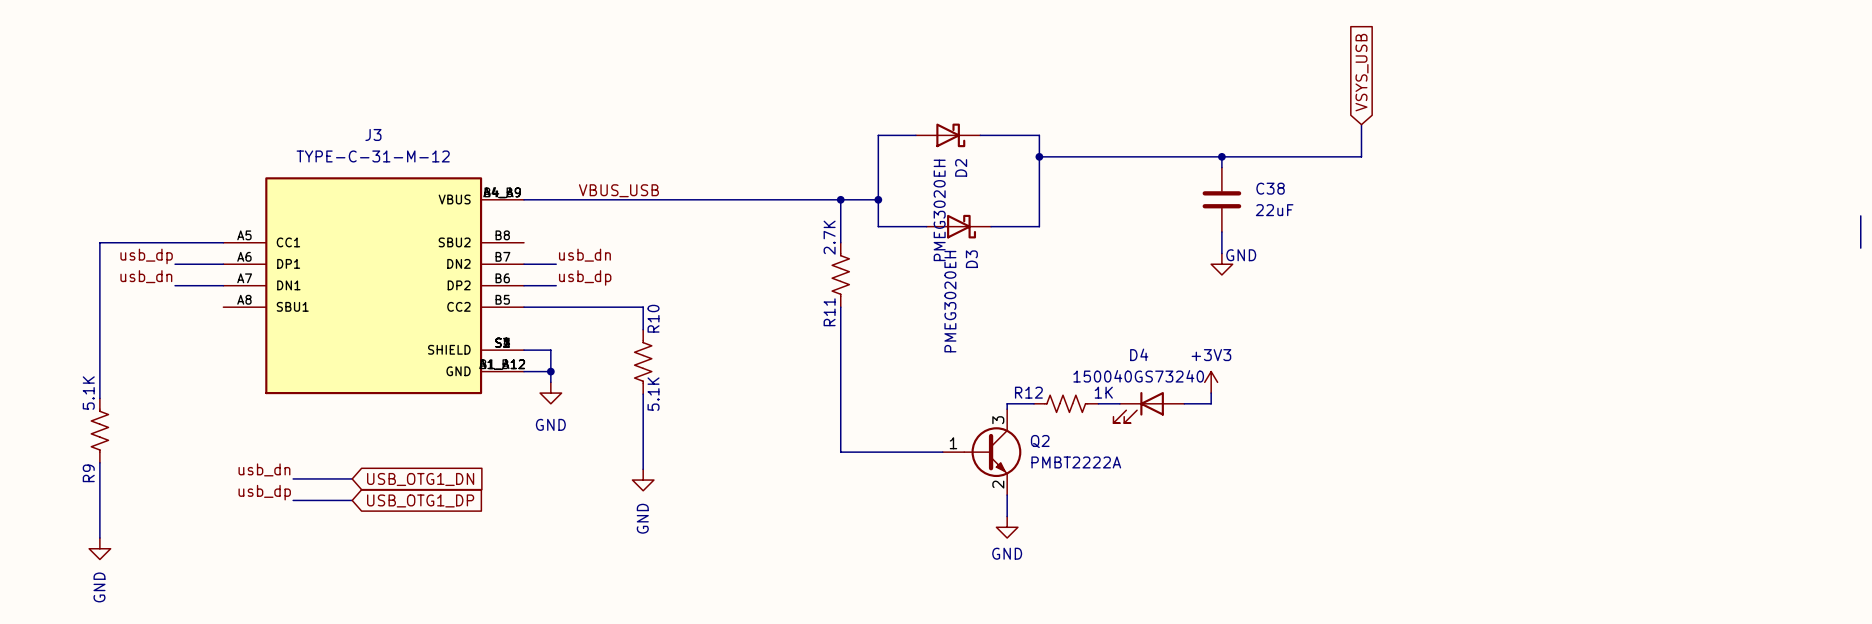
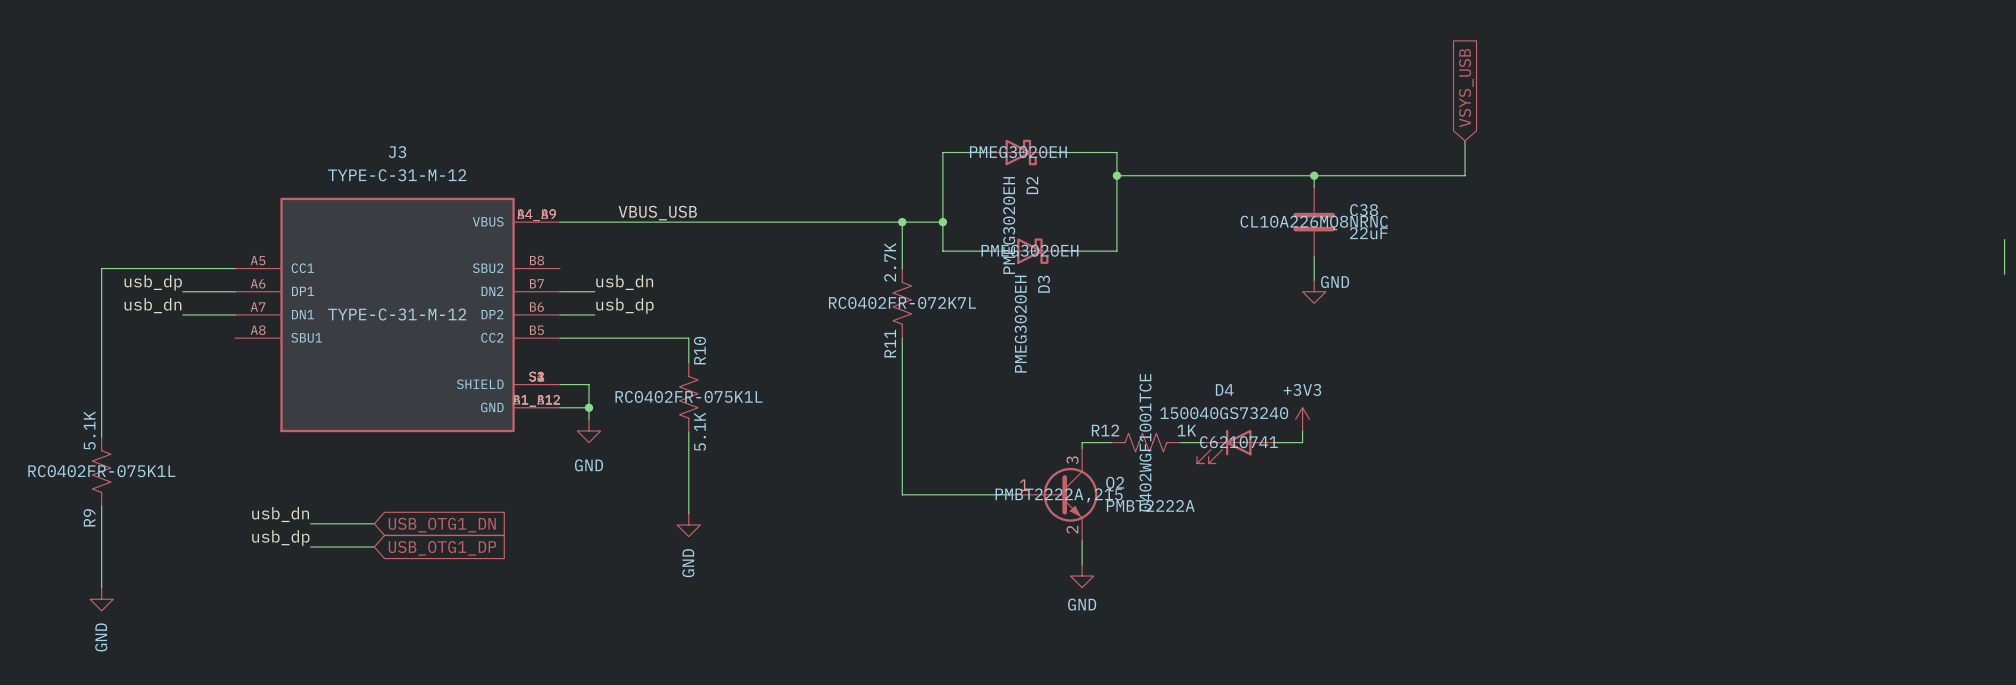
D2 text: none -> PMEG3020EH (1018, 152)
C38 text: none -> CL10A226MQ8NRNC (1314, 222)
D3 text: none -> PMEG3020EH (1029, 250)
R11 text: none -> RC0402FR-072K7L (902, 302)
J3 text: none -> TYPE-C-31-M-12 (397, 314)
R10 text: none -> RC0402FR-075K1L (688, 396)
R12 text: none -> 0402WGF1001TCE (1145, 442)
D4 text: none -> C6210741 (1238, 442)
R9 text: none -> RC0402FR-075K1L (101, 471)
Q2 text: none -> PMBT2222A,215 (1059, 495)

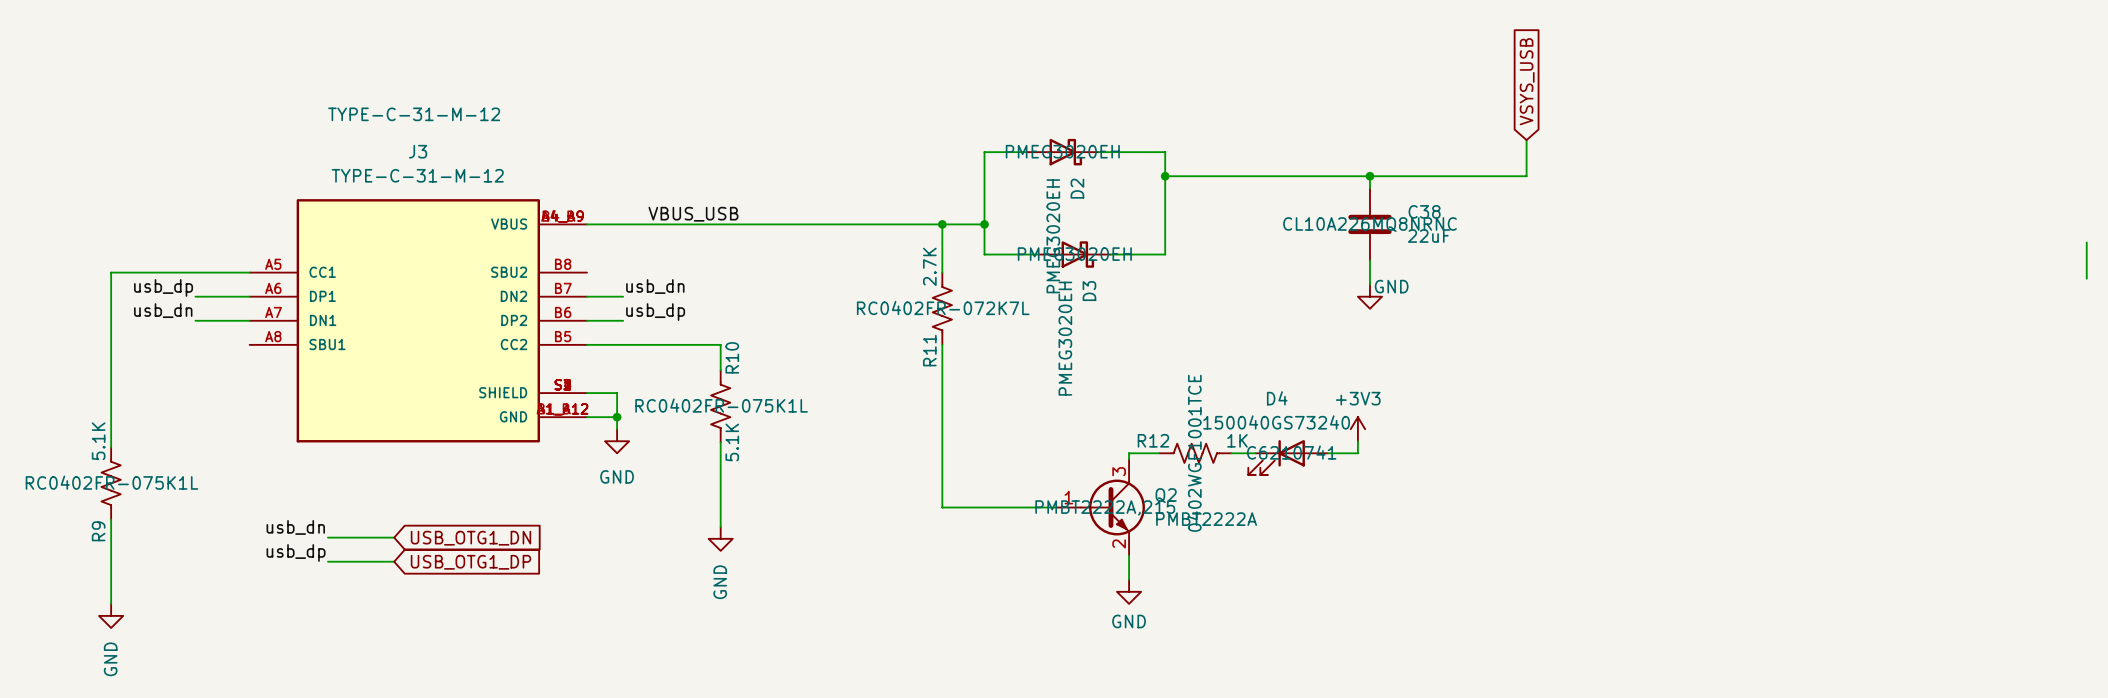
J3 text position: TYPE-C-31-M-12 (397, 314) -> TYPE-C-31-M-12 (414, 114)

